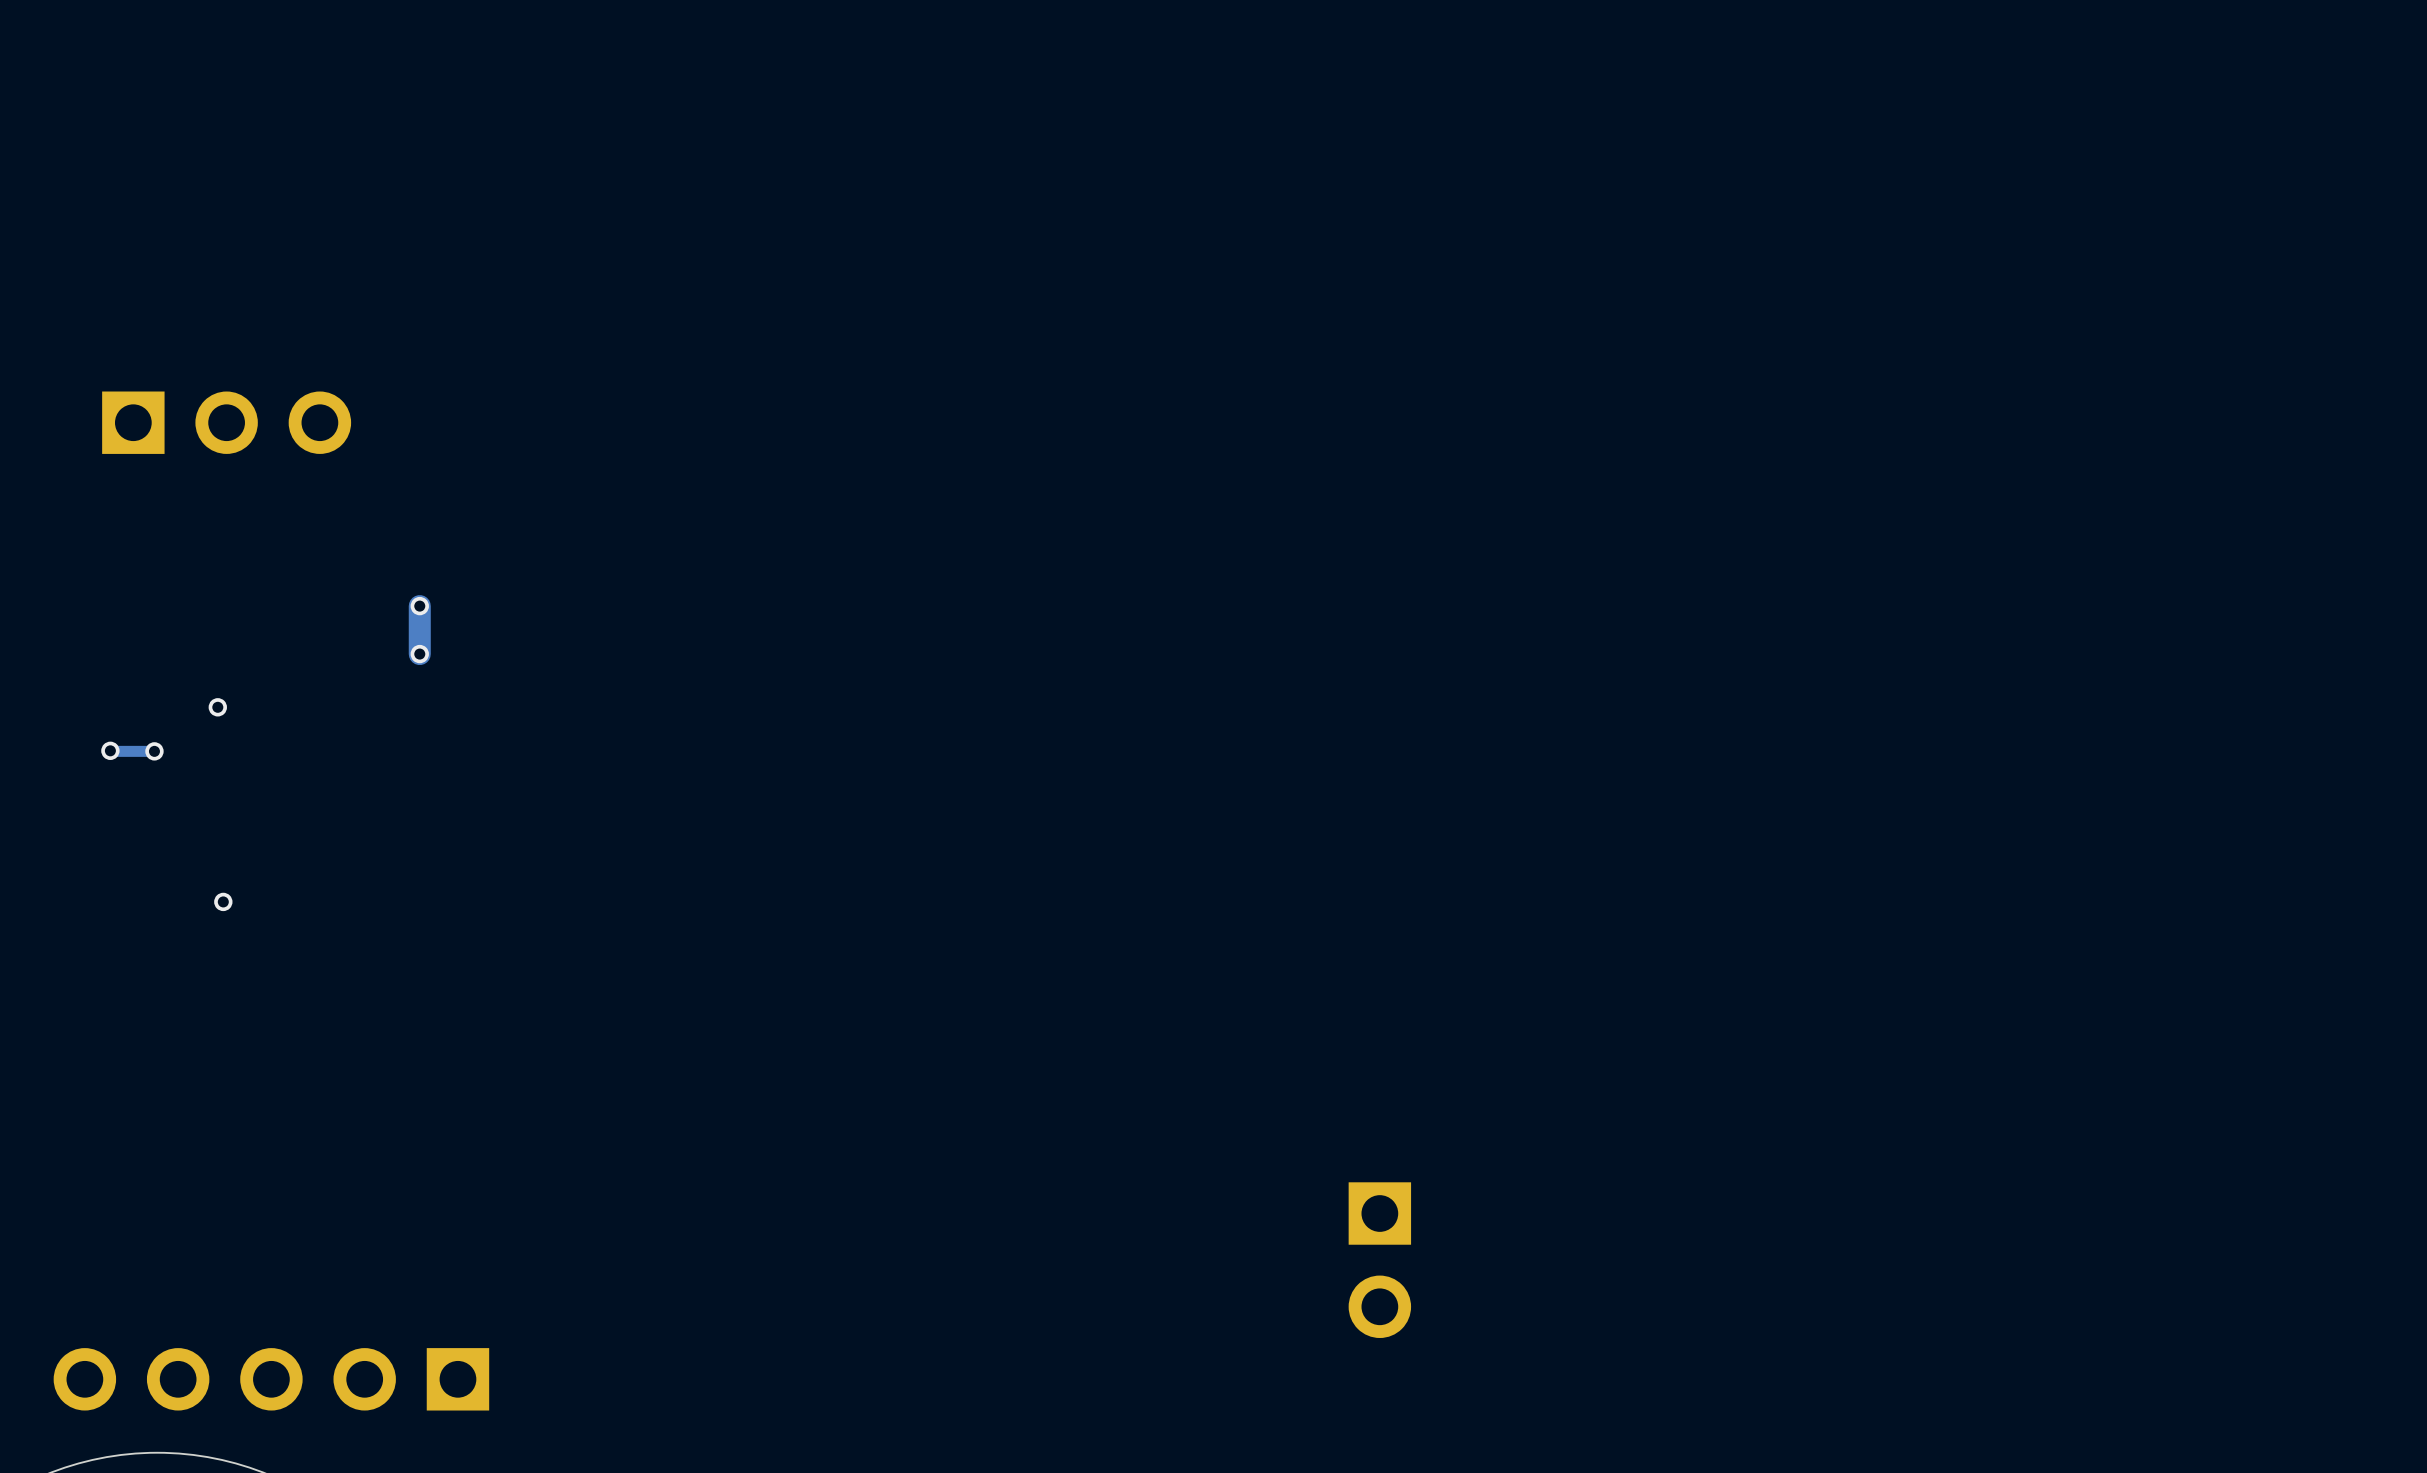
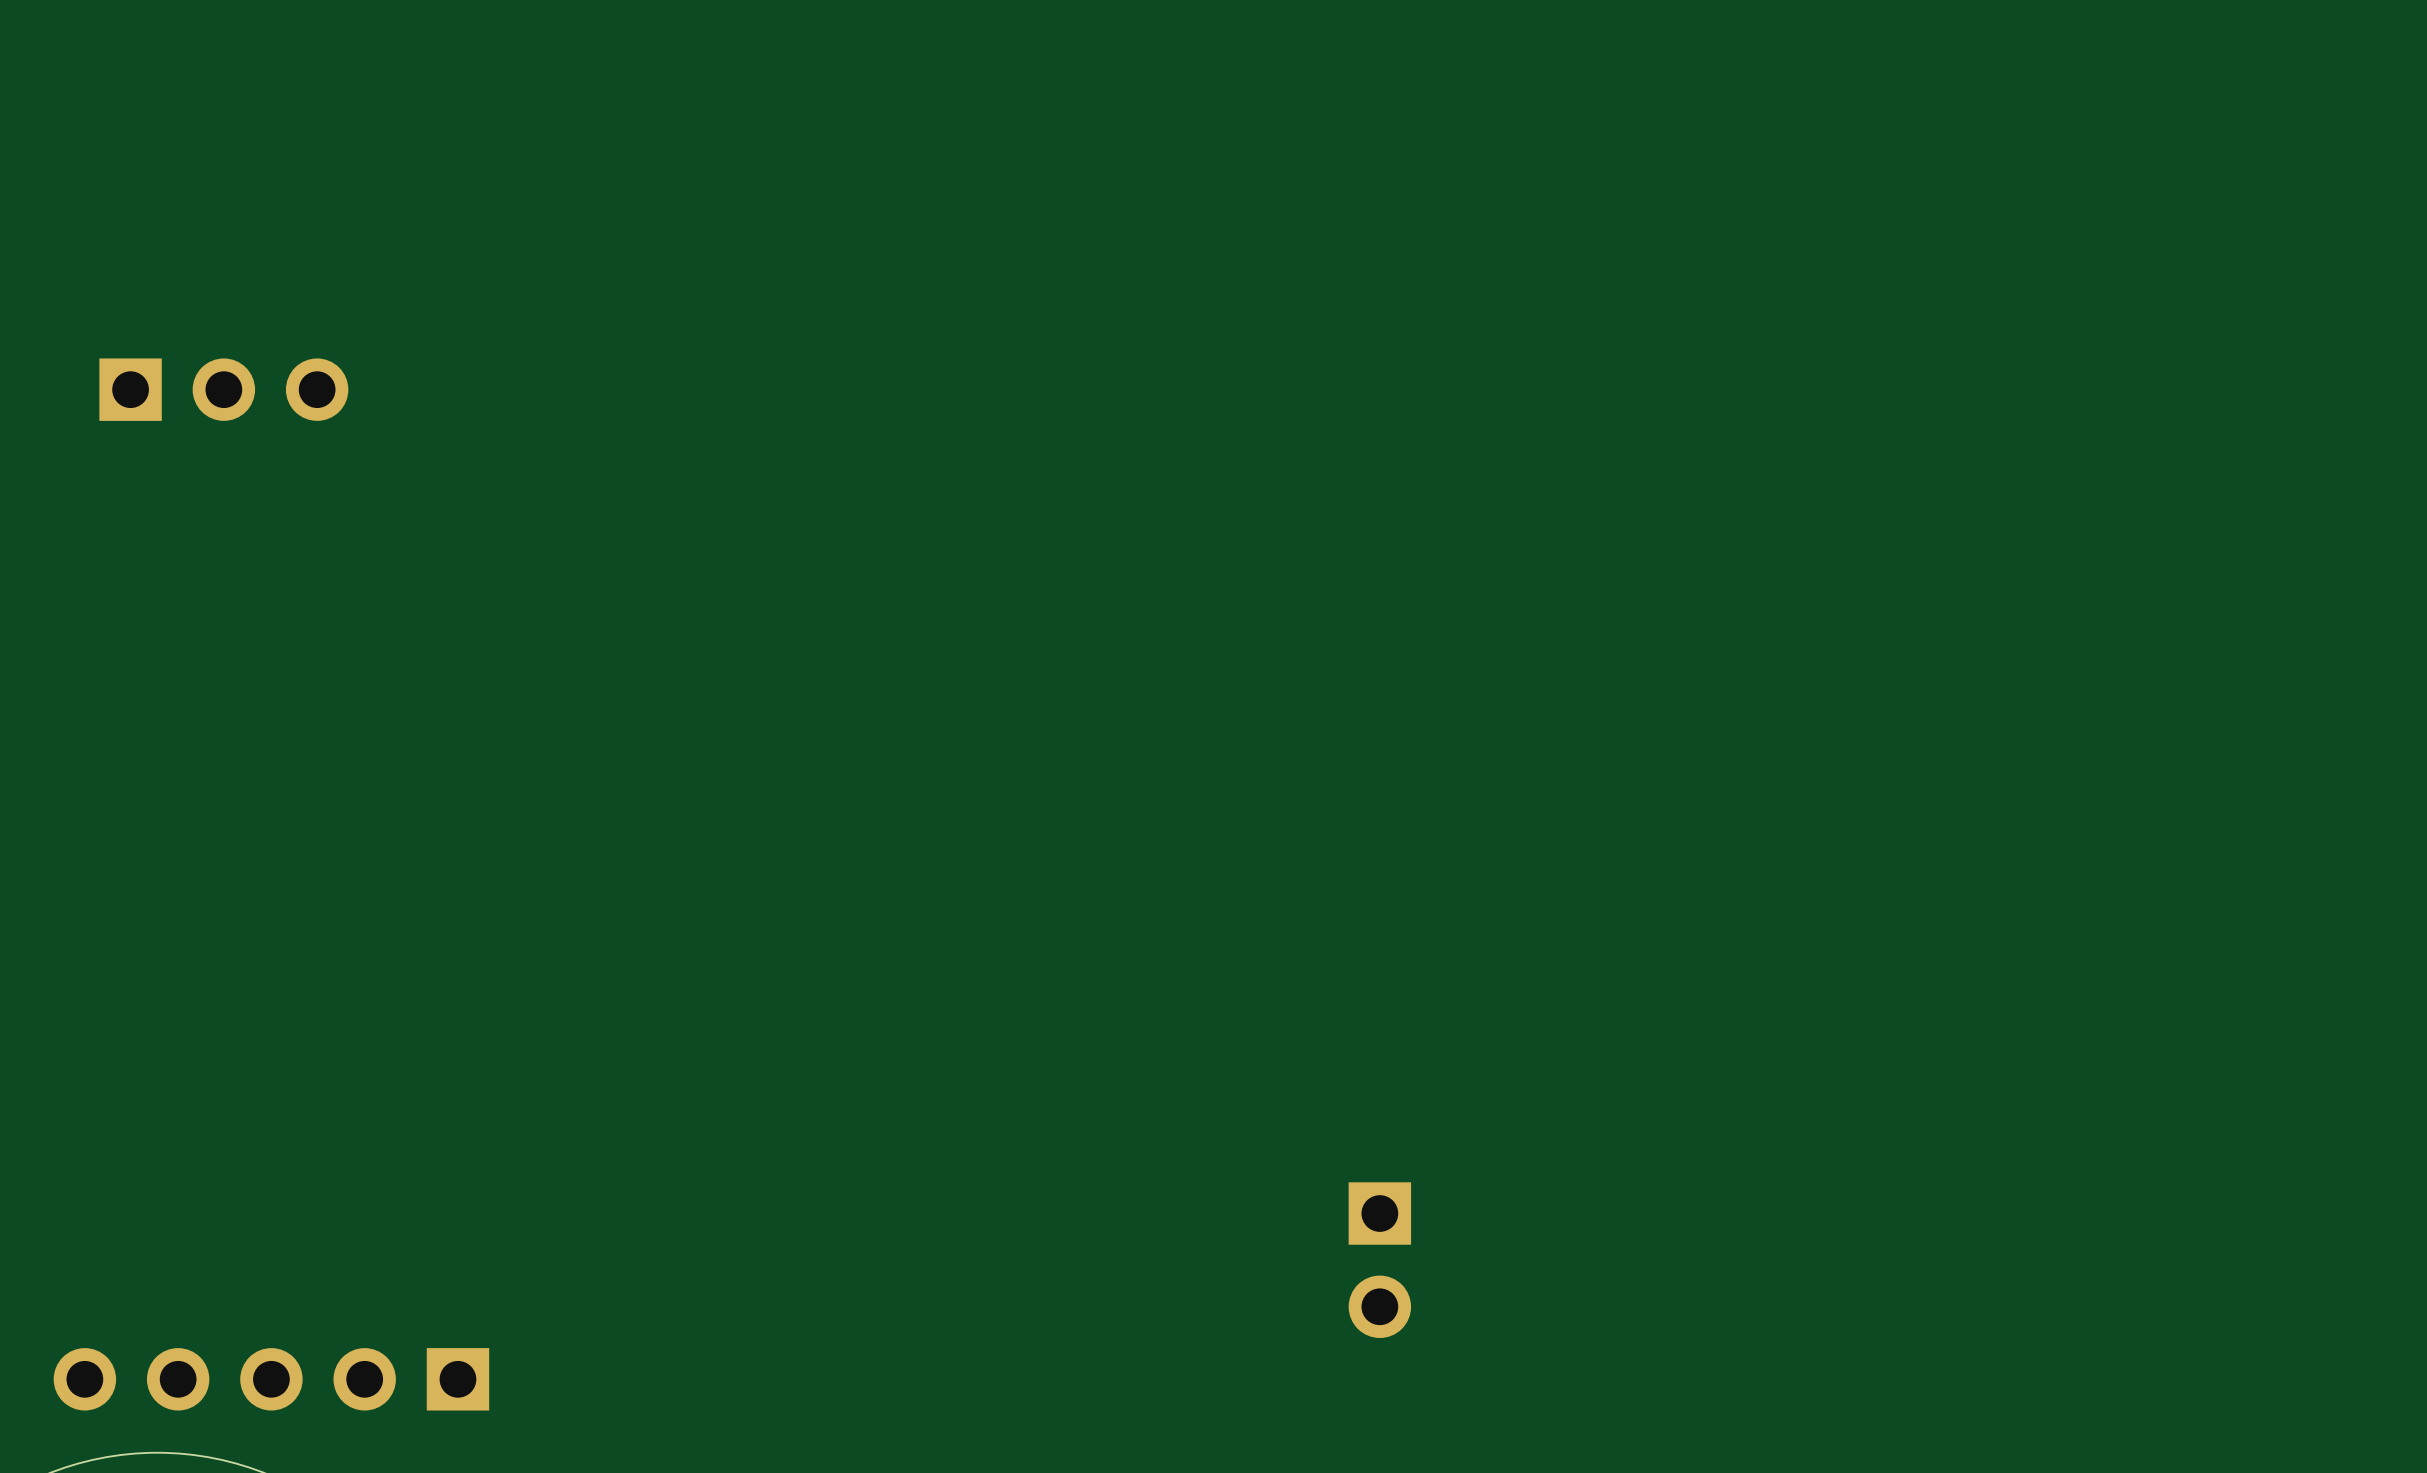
part position: (226, 422) -> (223, 389)
track: (419, 606) (419, 654) -> none
via: (419, 606) -> none
via: (419, 654) -> none
via: (217, 707) -> none
track: (110, 750) (154, 751) -> none
via: (110, 750) -> none
via: (154, 751) -> none
via: (223, 901) -> none

